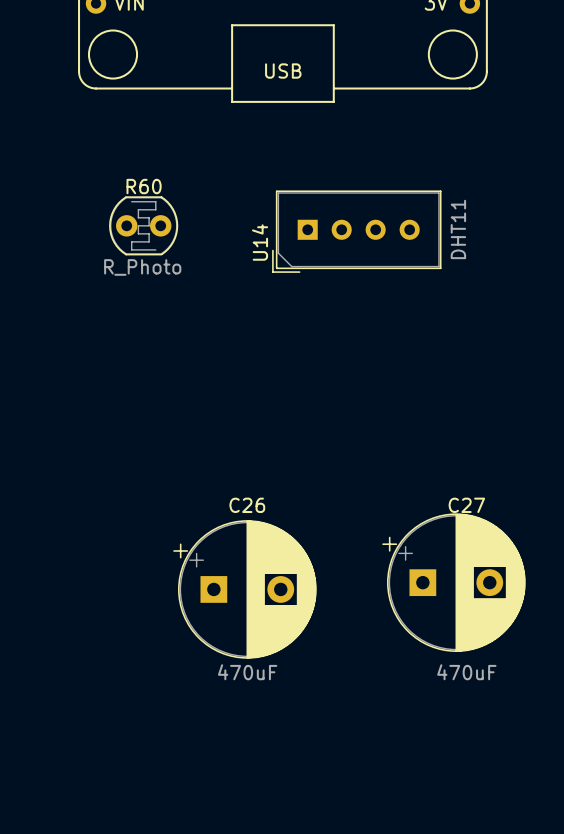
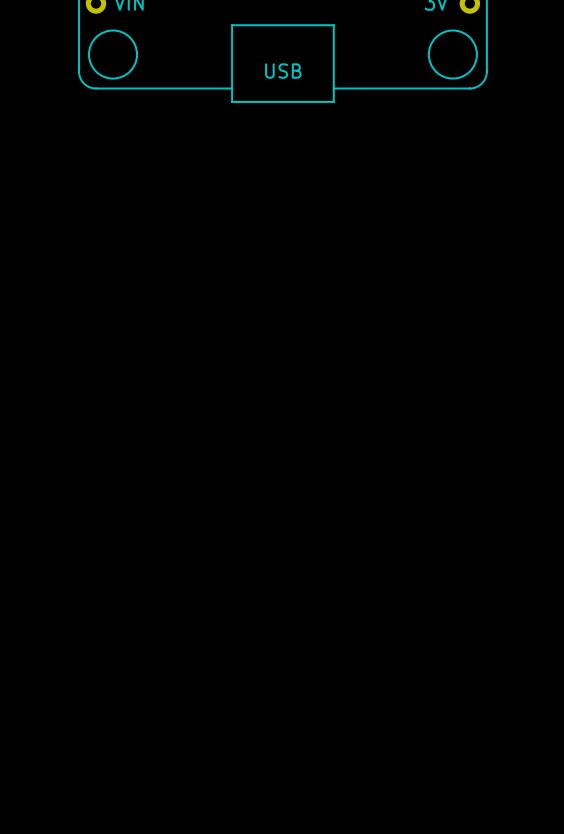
R60: R_Photo (143, 225) -> none
U14: DHT11 (356, 231) -> none
C27: 470uF (453, 582) -> none
C26: 470uF (244, 589) -> none

